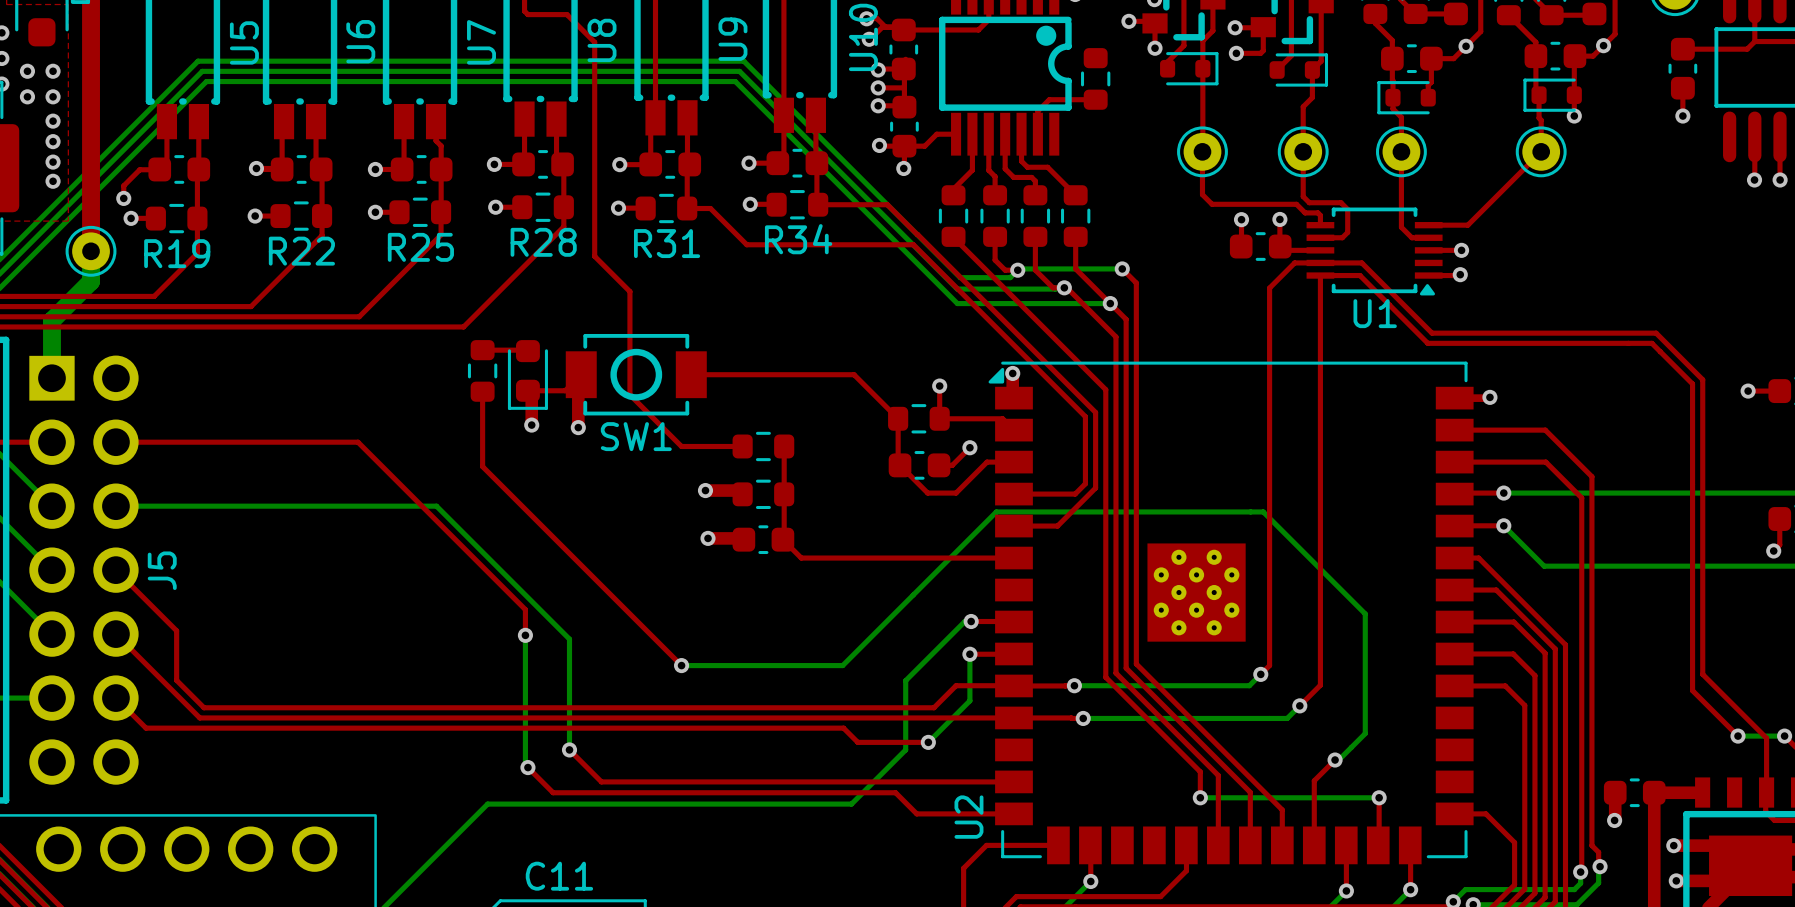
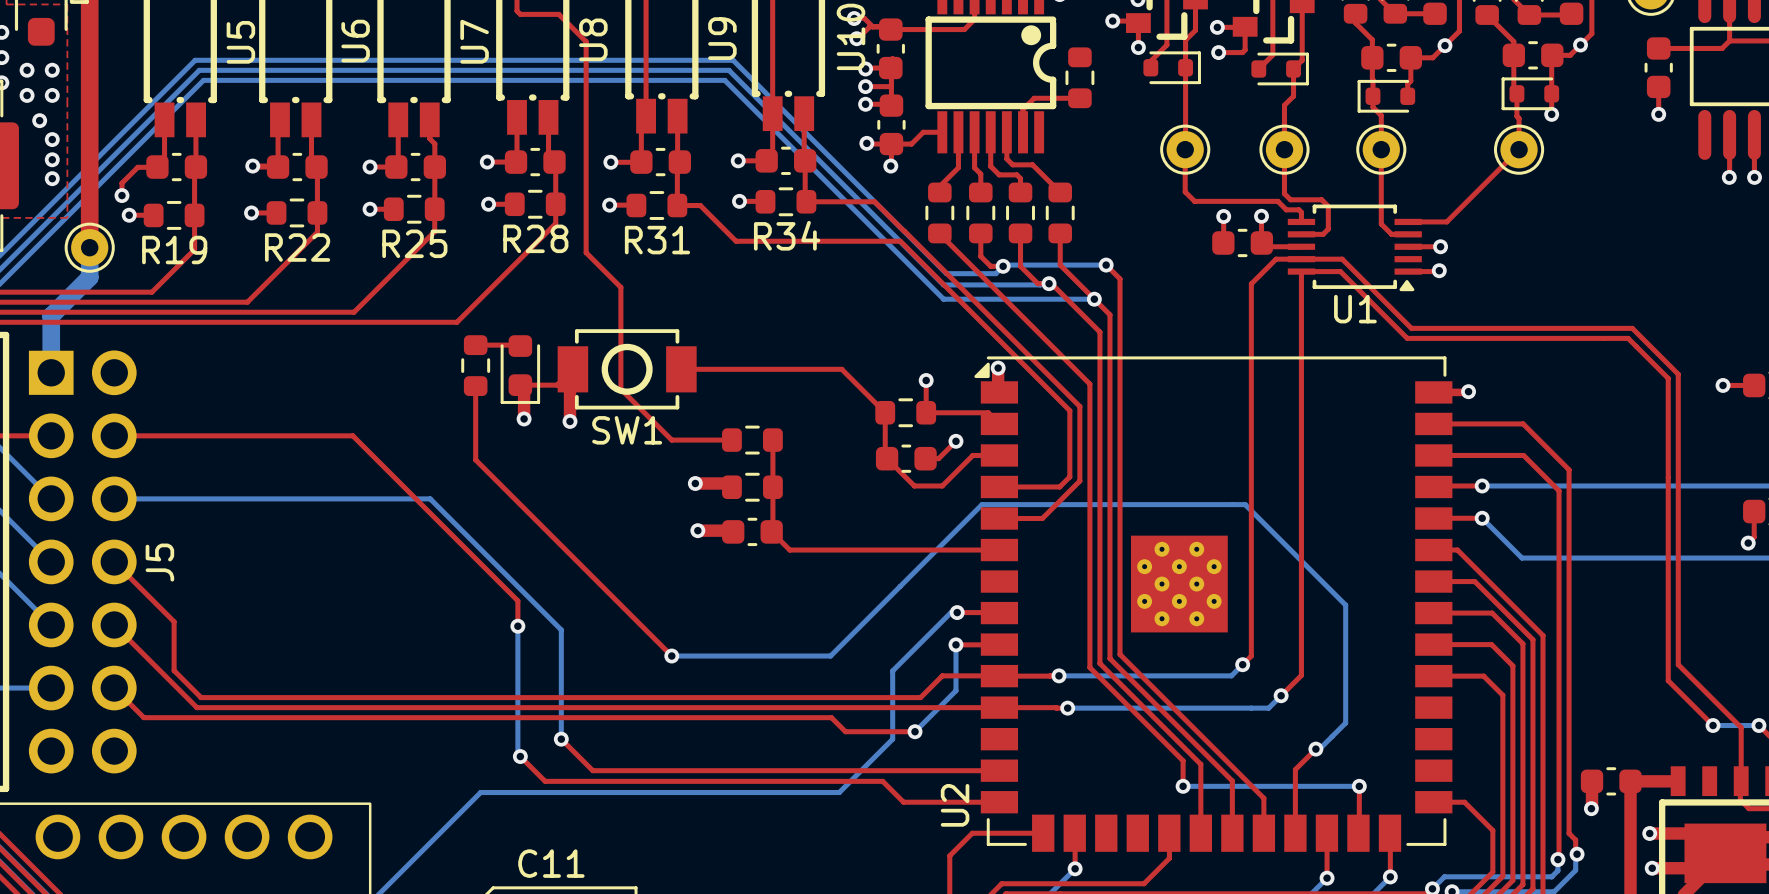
via position: (53, 121) -> (39, 120)

